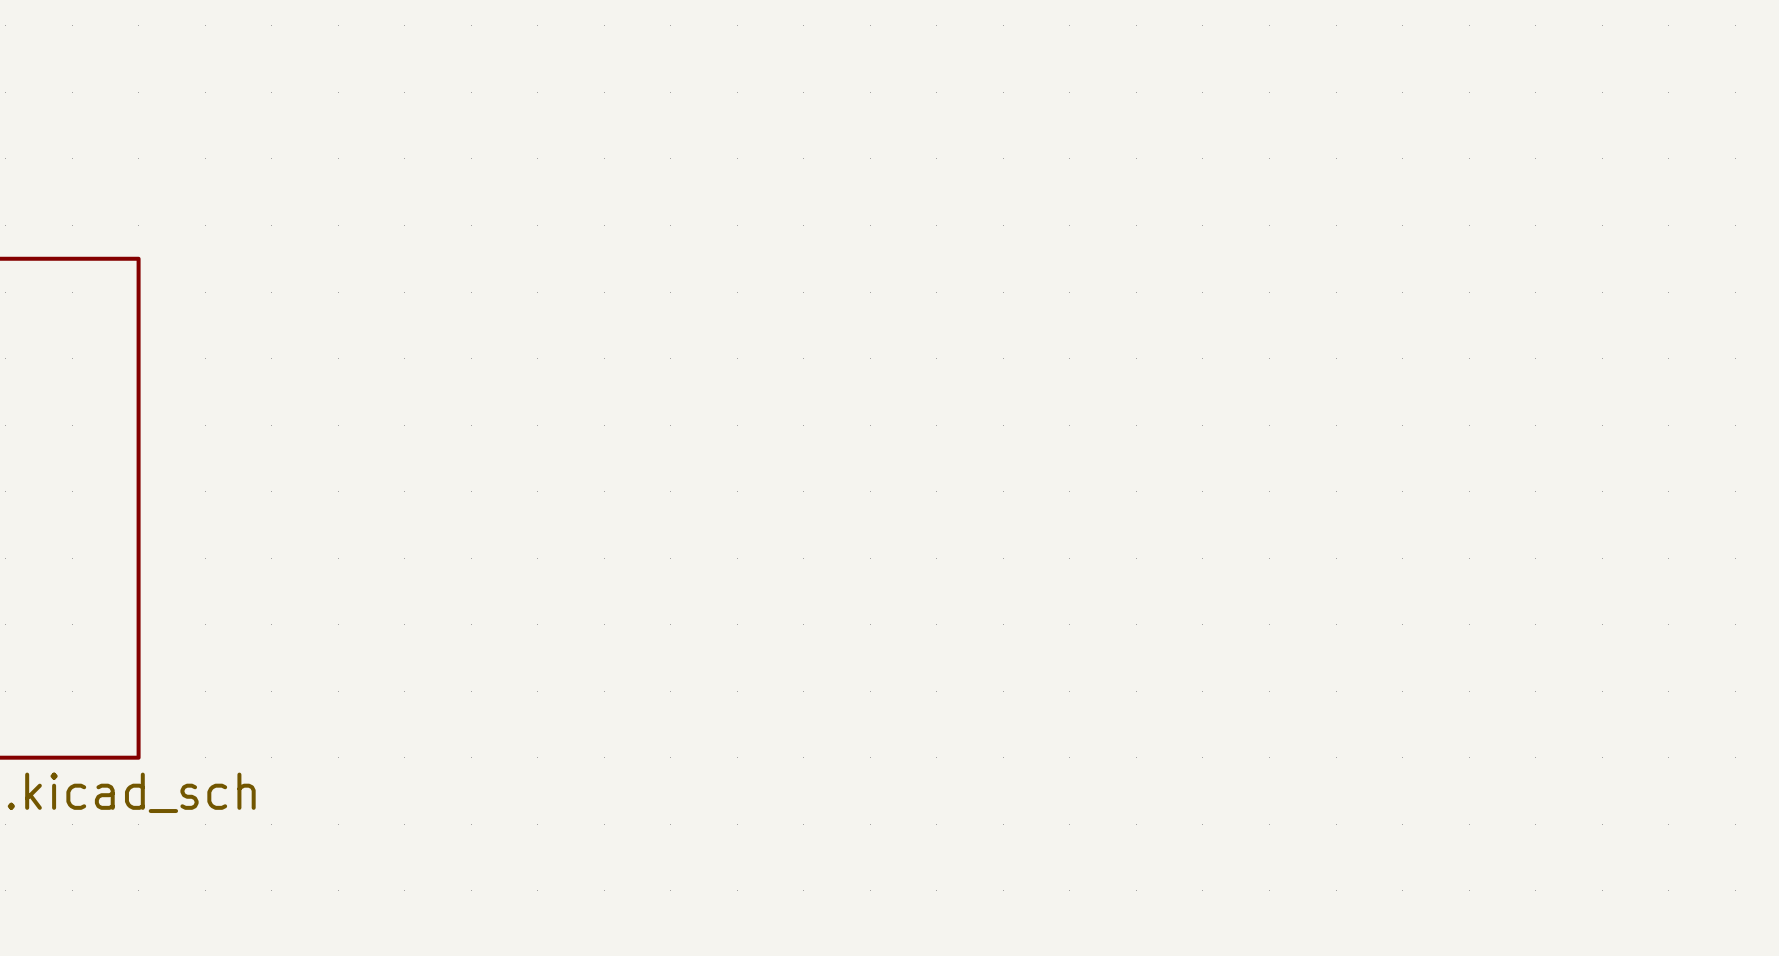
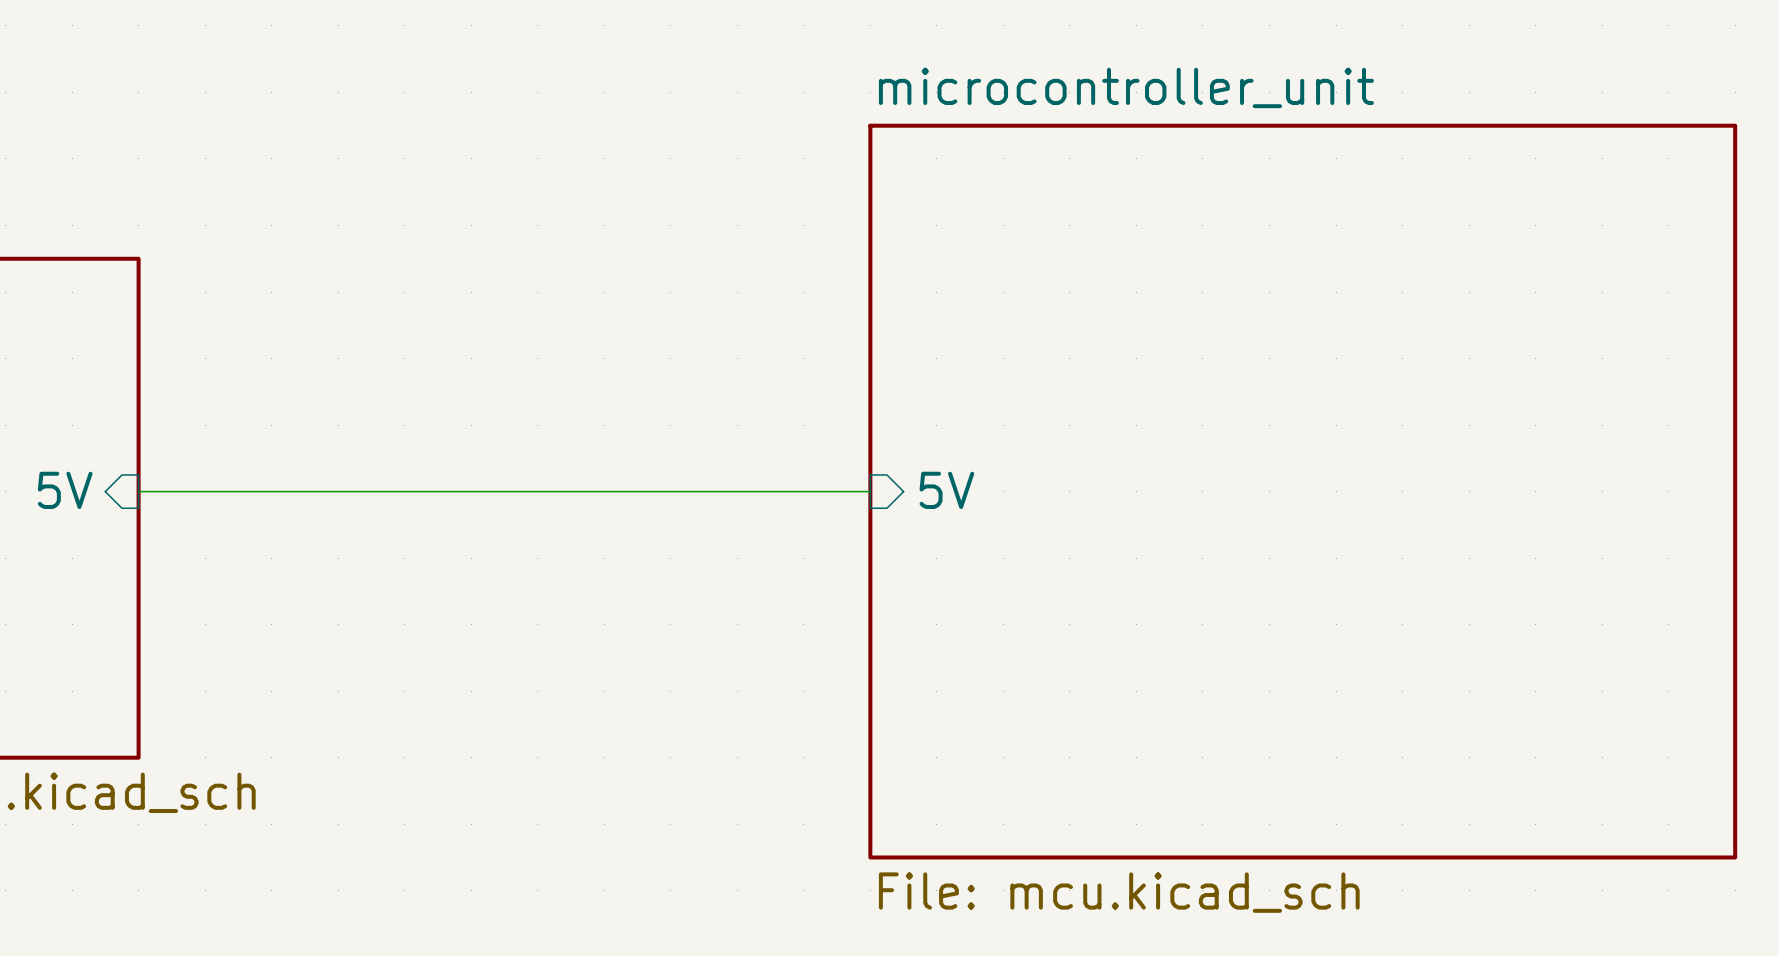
sheet pin: none -> 5V (65, 490)
sheet pin: none -> 5V (946, 490)
wire: none -> (138, 491) (870, 491)
sheet microcontroller_unit: none -> File: mcu.kicad_sch (1302, 491)

